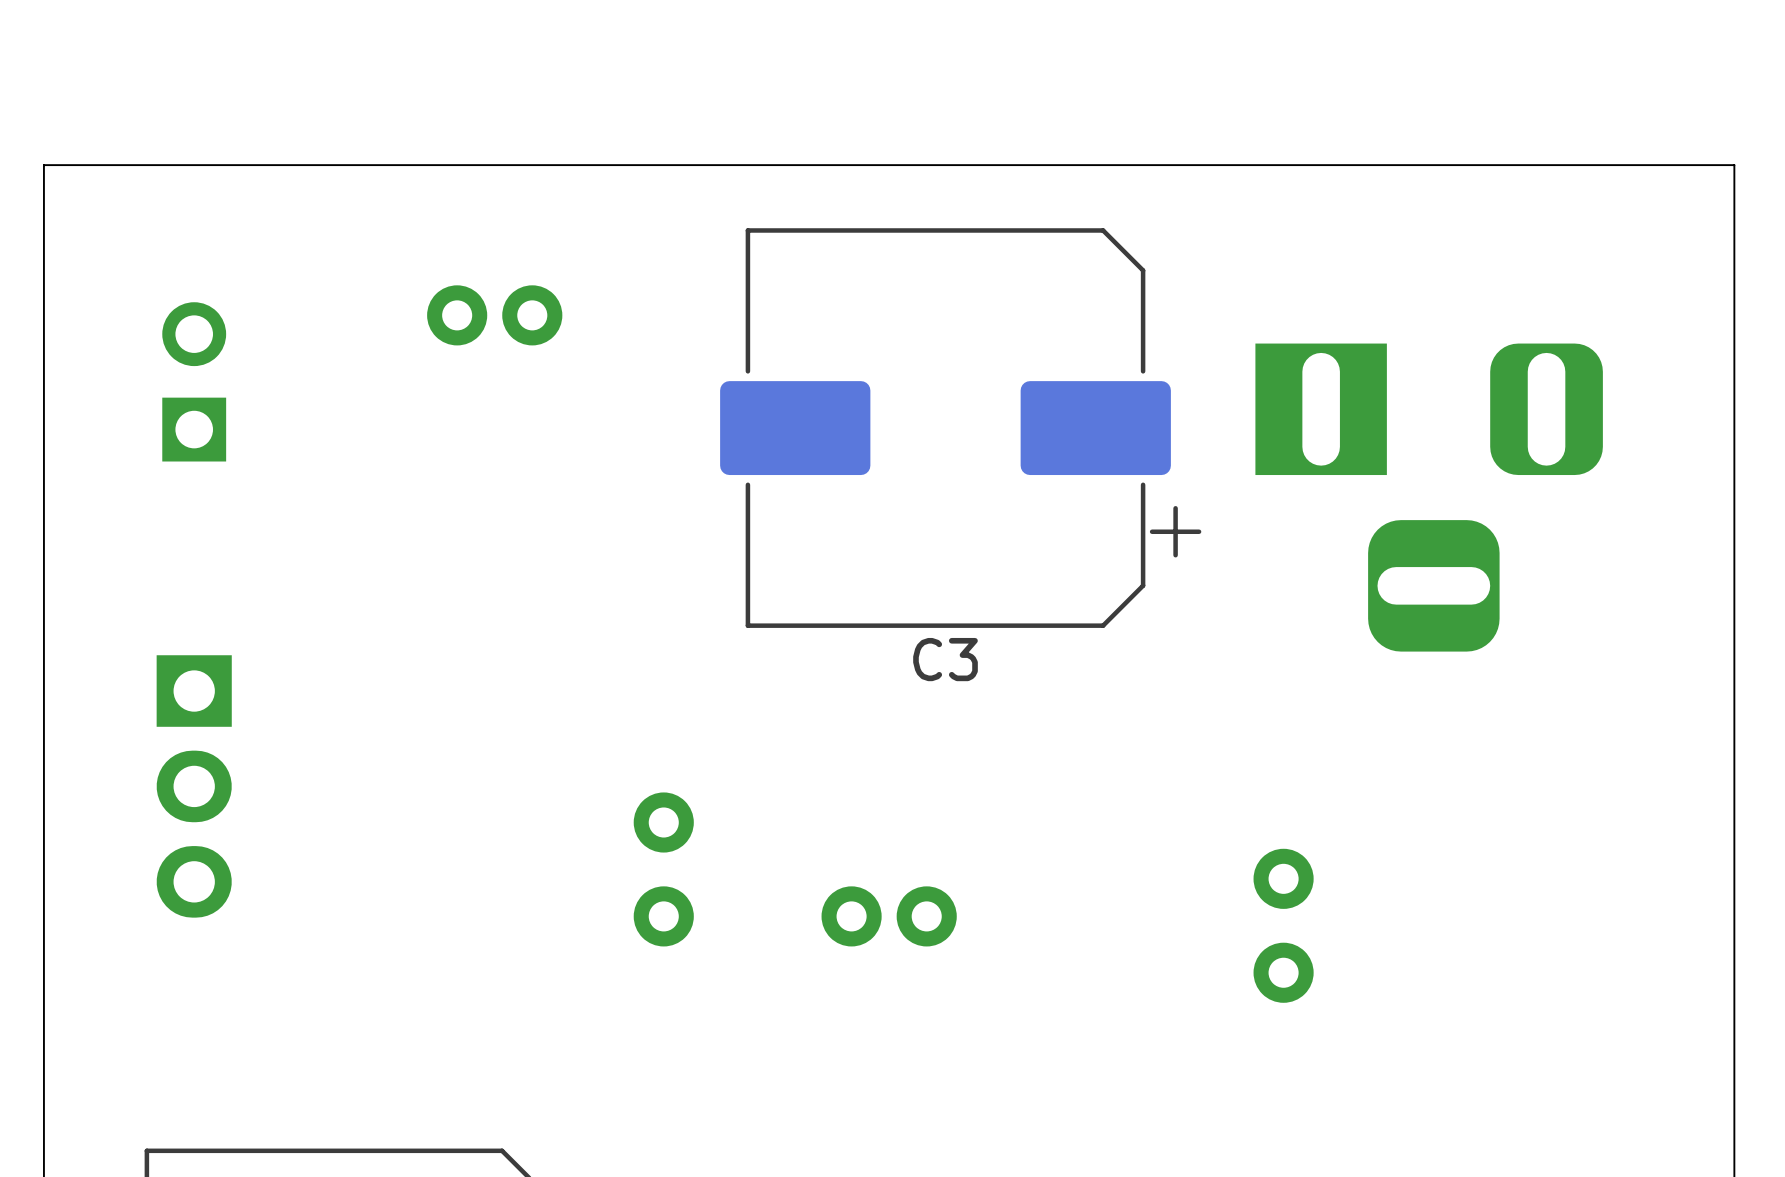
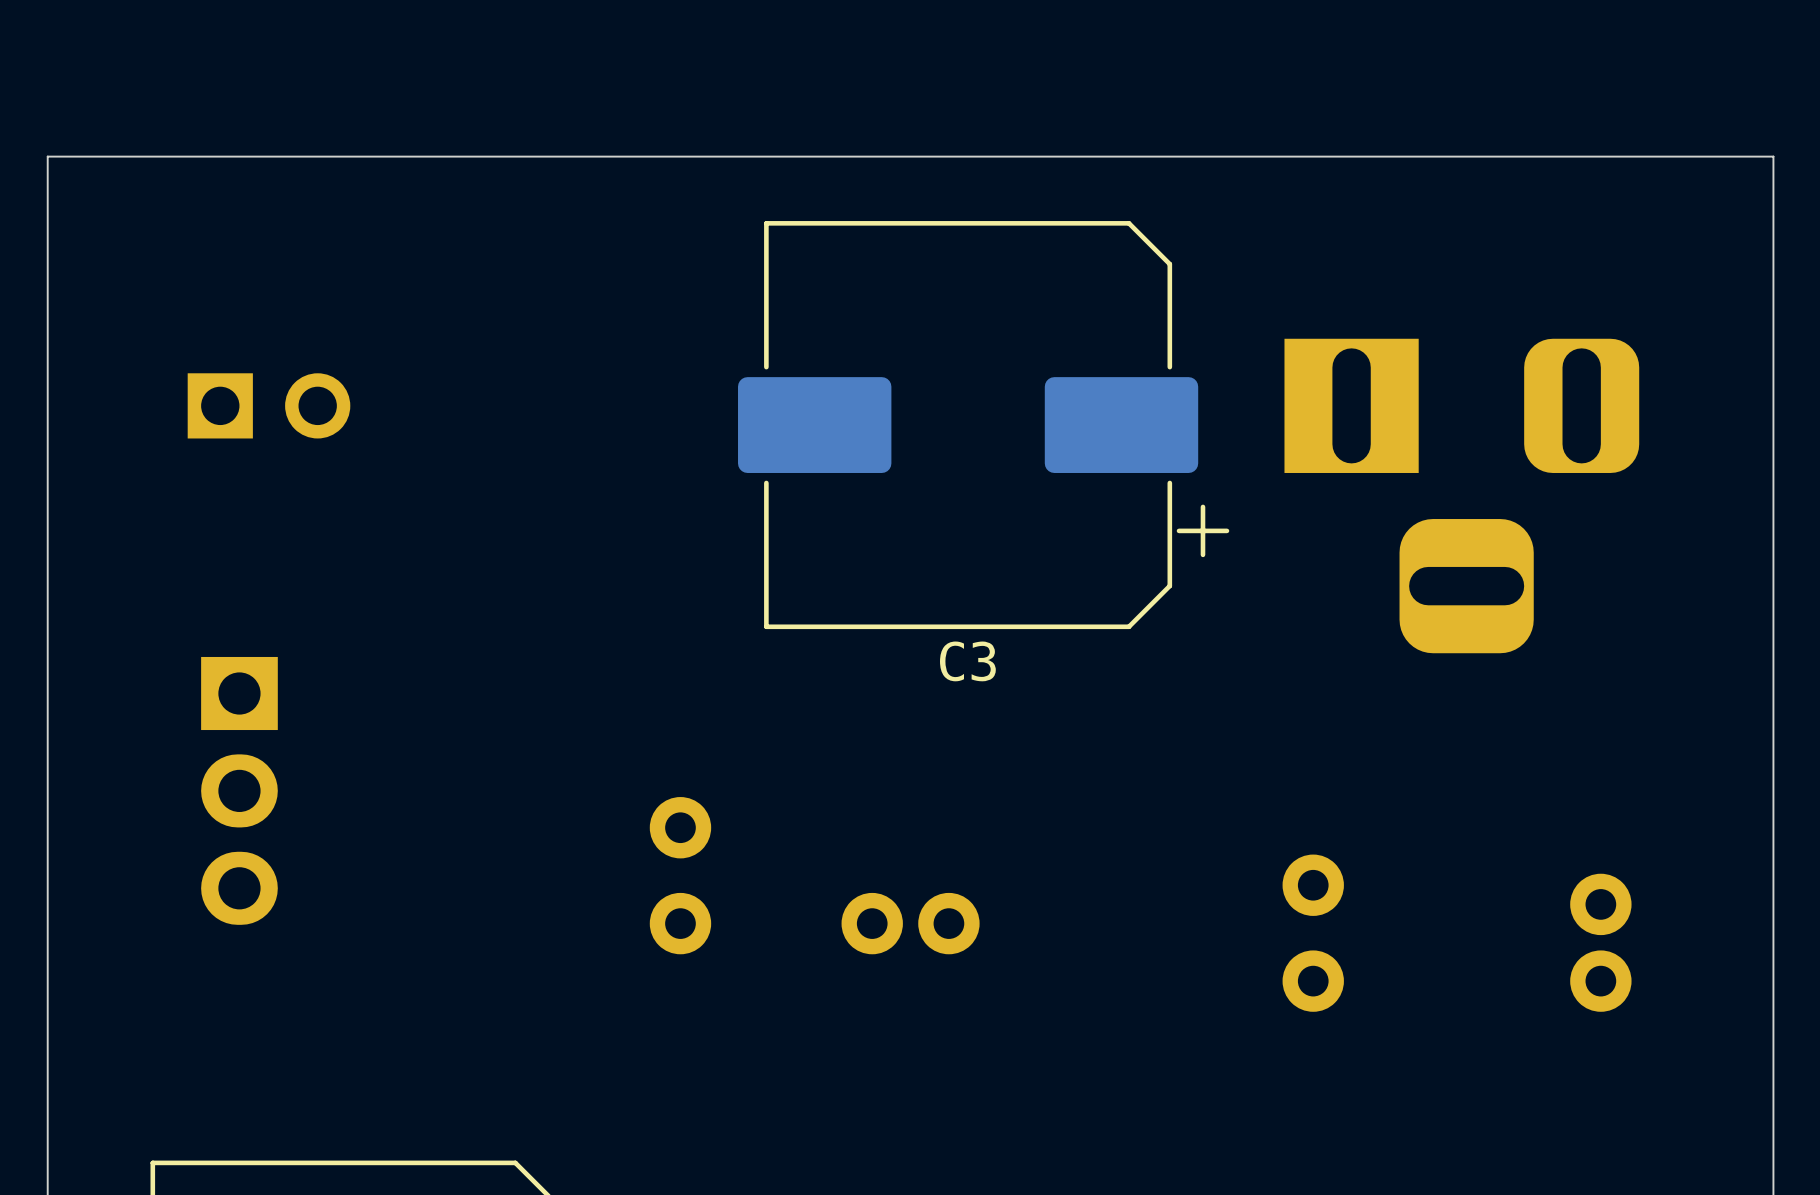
part: (494, 315) -> none
part rotation: 0° (194, 381) -> 90° clockwise (268, 405)
part position: (194, 786) -> (239, 790)
part: none -> (1600, 942)

